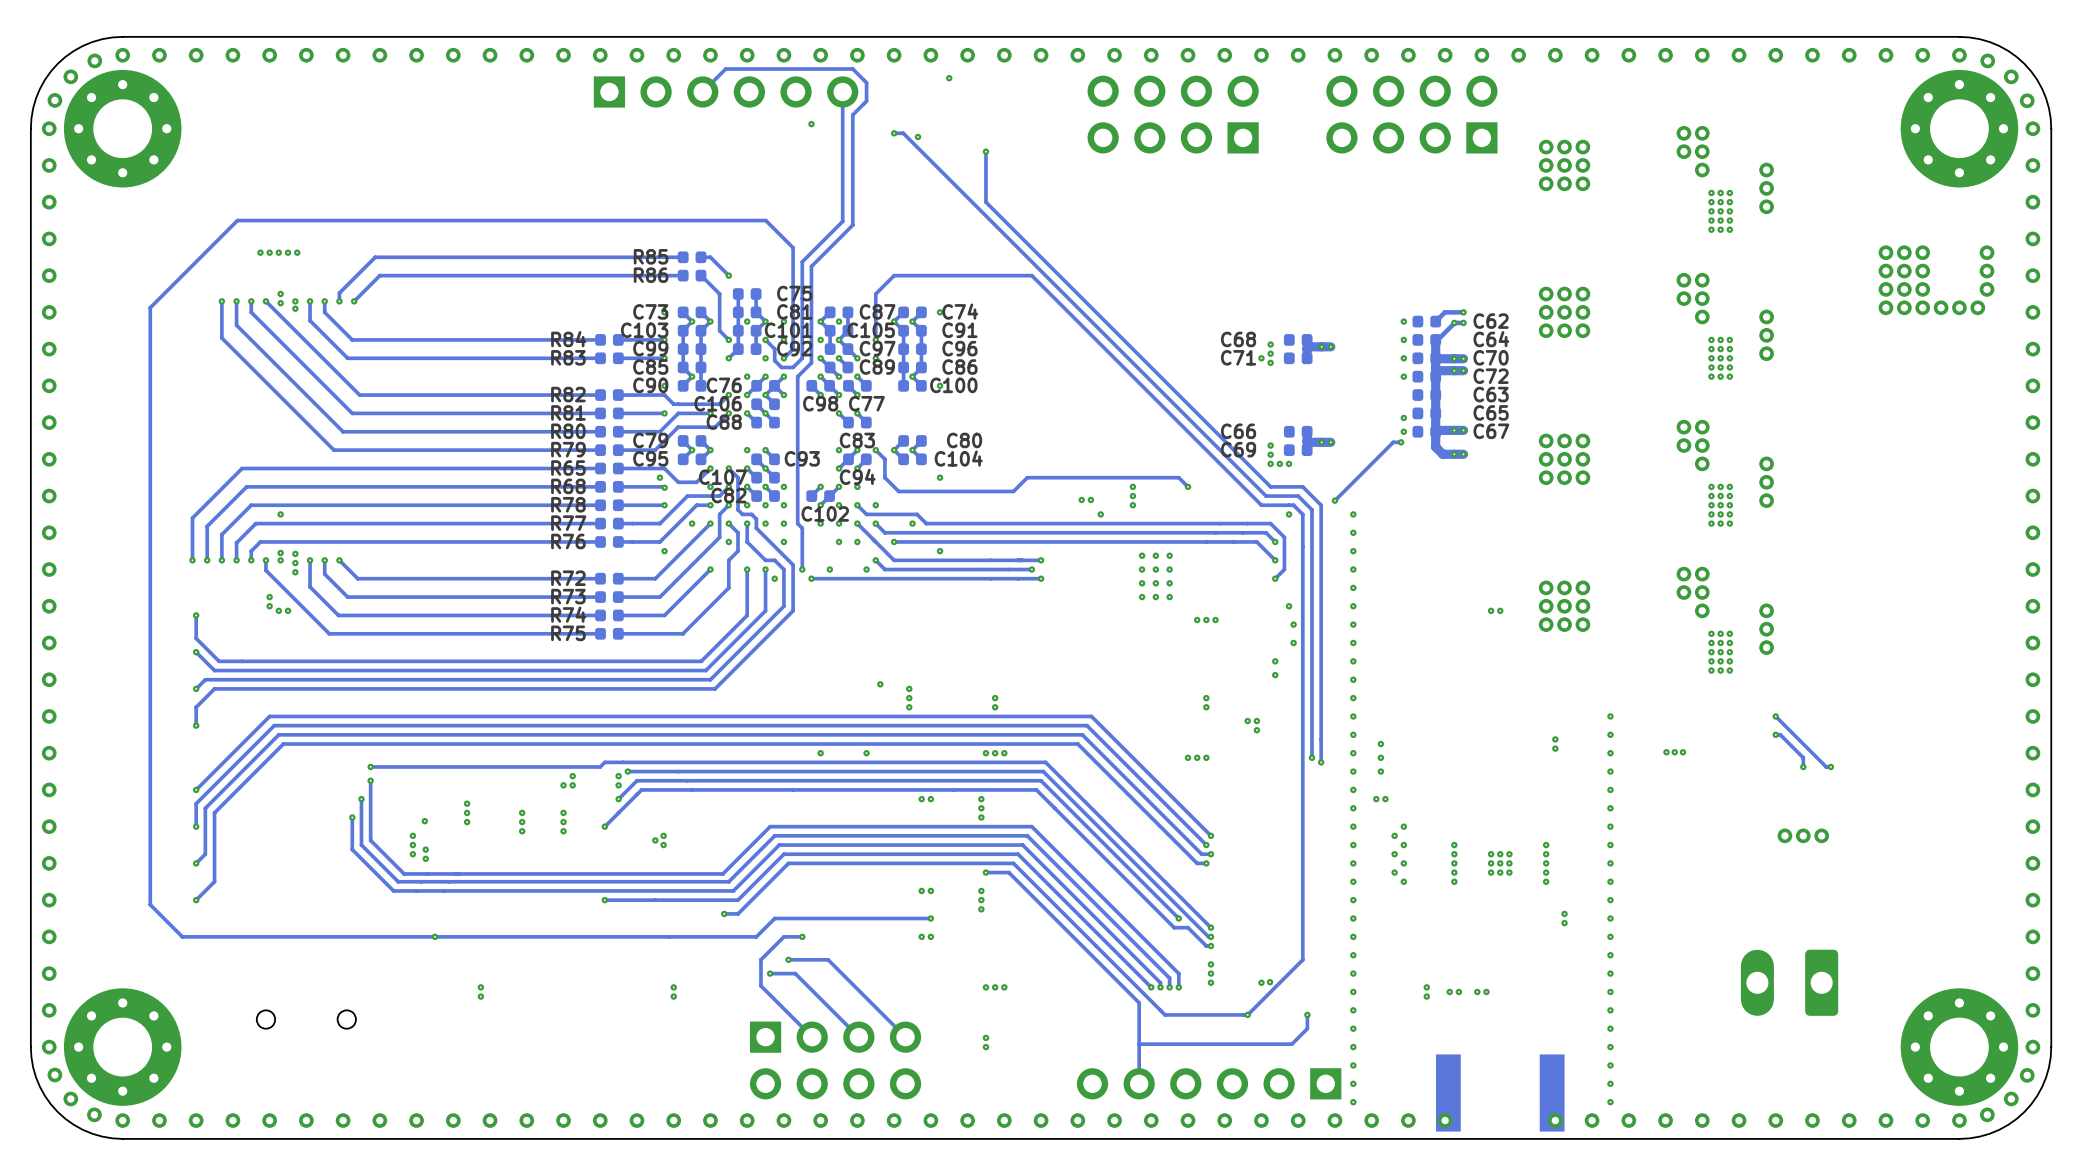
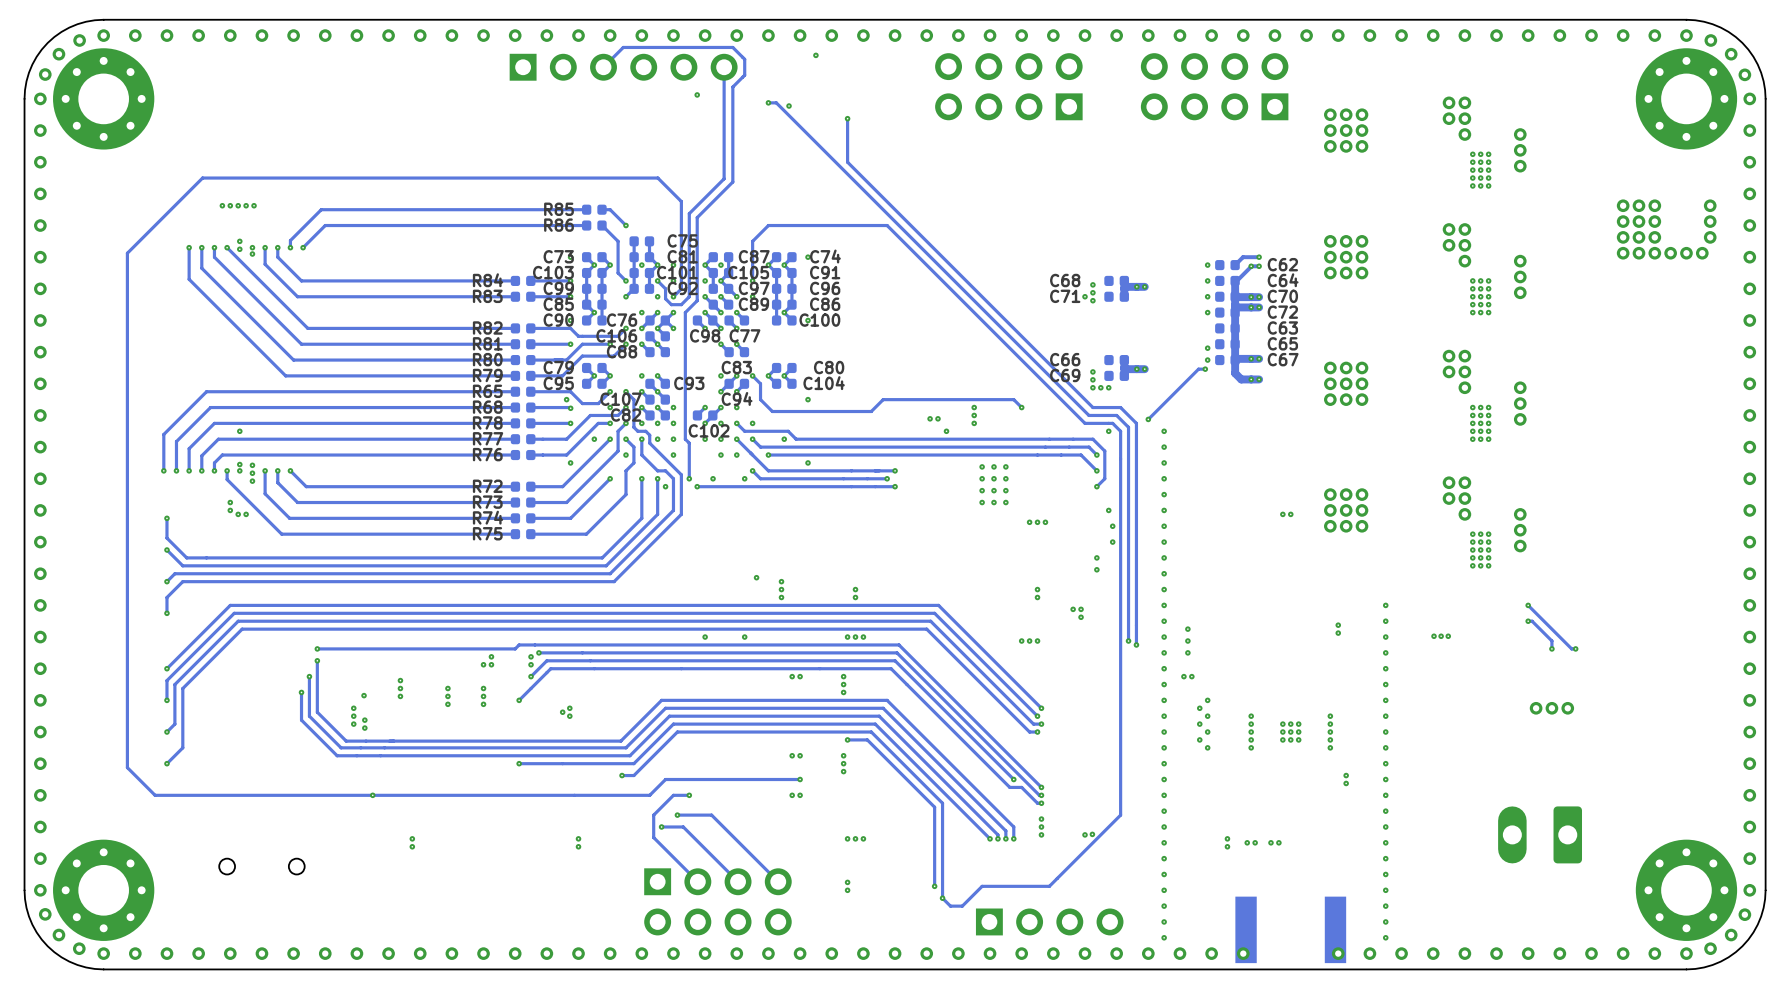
track: (1096, 946) (1165, 1014) (1247, 1014) -> (942, 803) (942, 898) (950, 906) (962, 906) (982, 886) (1049, 886) (1073, 862)
track: (1086, 950) (1139, 1002) (1139, 1083) -> (934, 807) (934, 886)
via: (1247, 1014) -> none
track: (1307, 1014) (1307, 1028) (1291, 1044) (1139, 1044) -> none
via: (1307, 1014) -> none
via: none -> (934, 886)
via: none -> (942, 898)
part footprint: [1076, 1068, 1342, 1100] -> [975, 908, 1124, 936]

